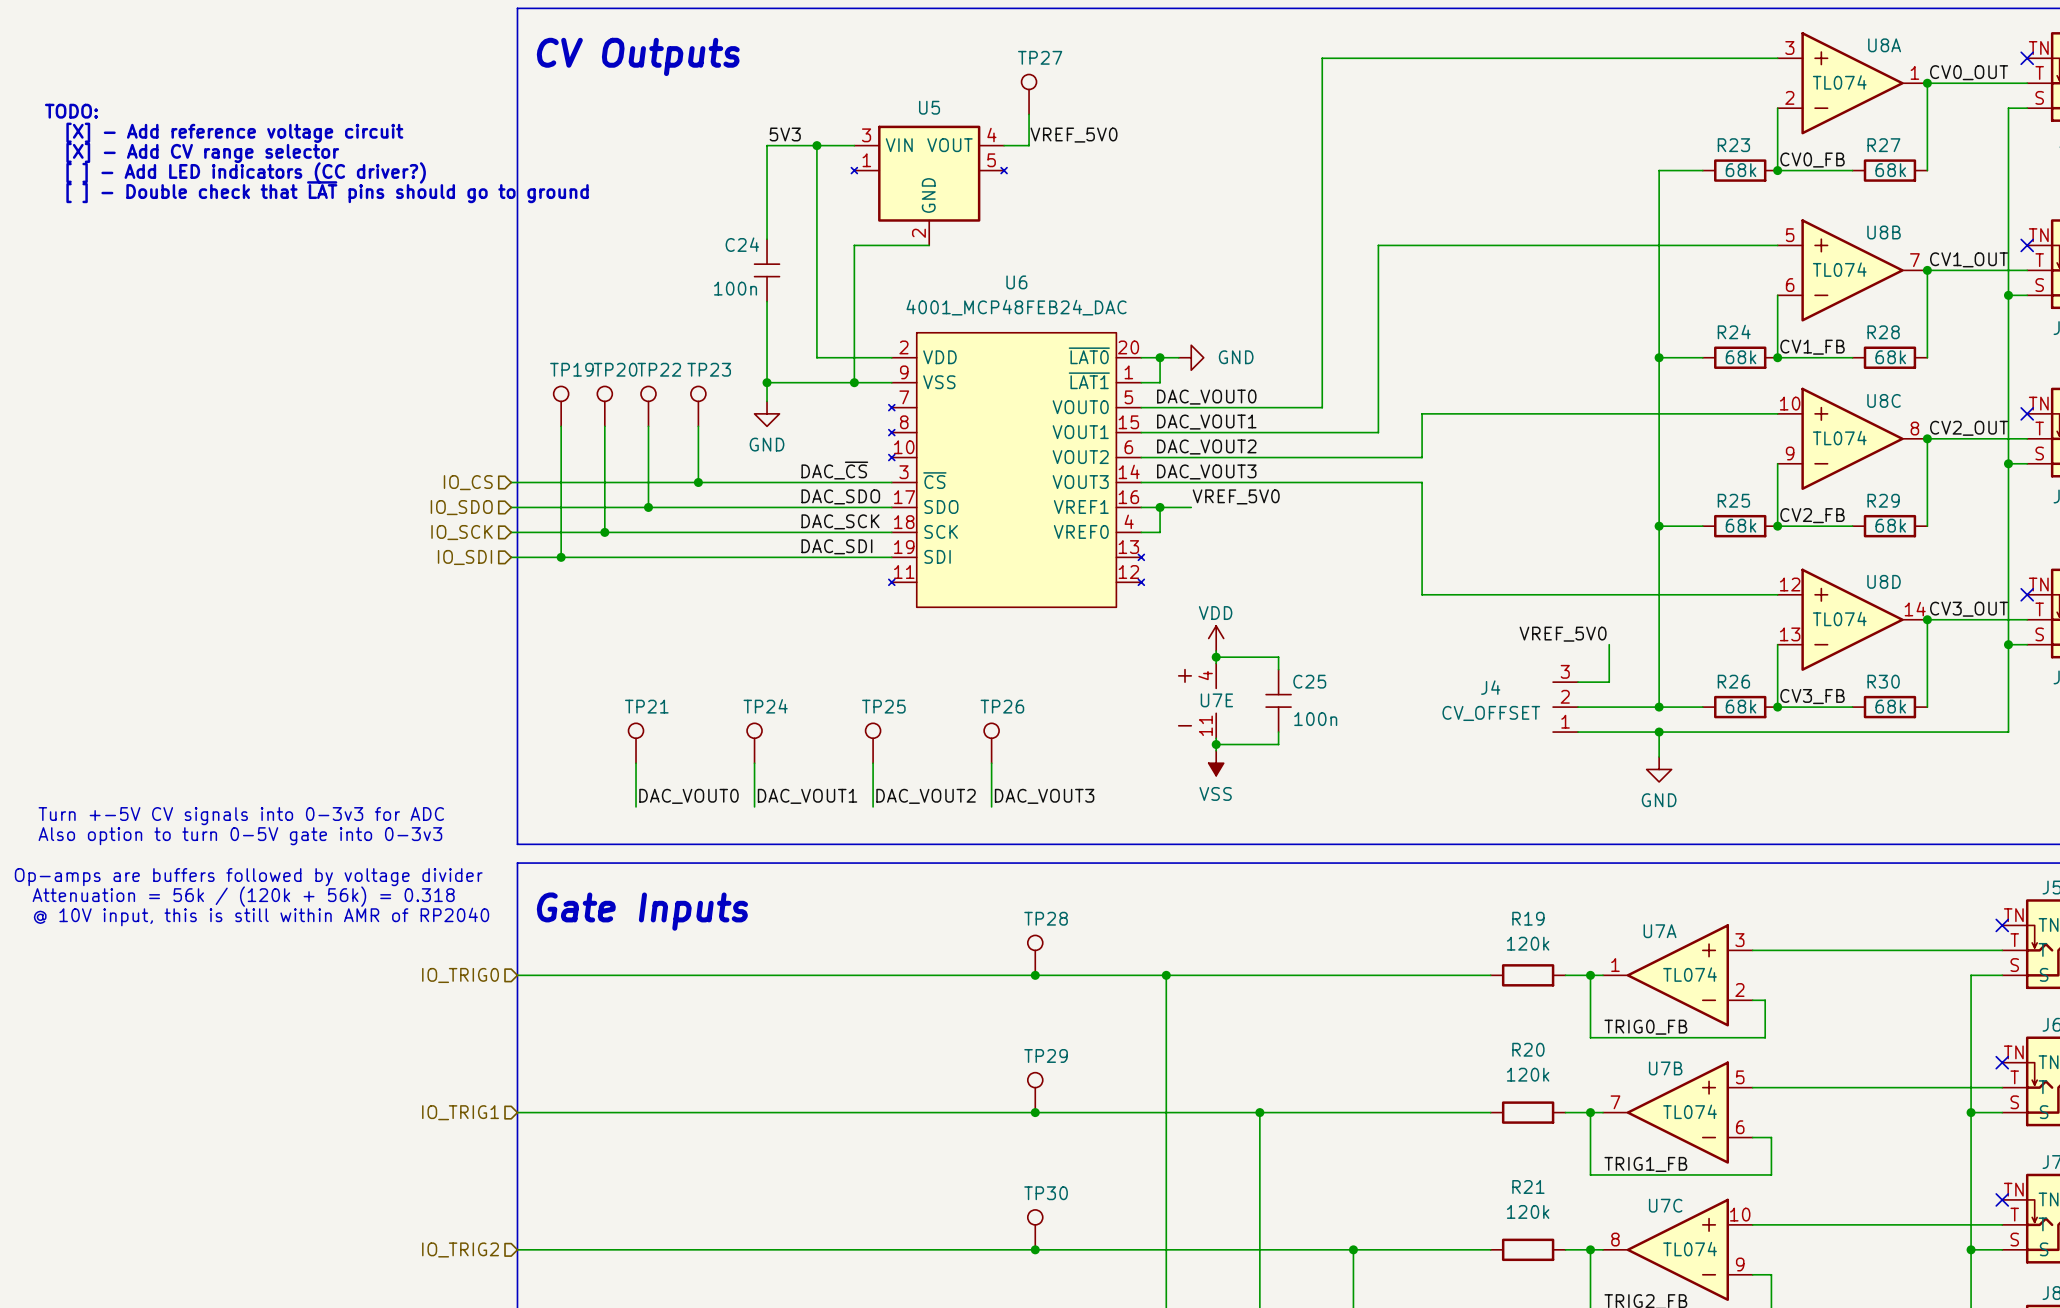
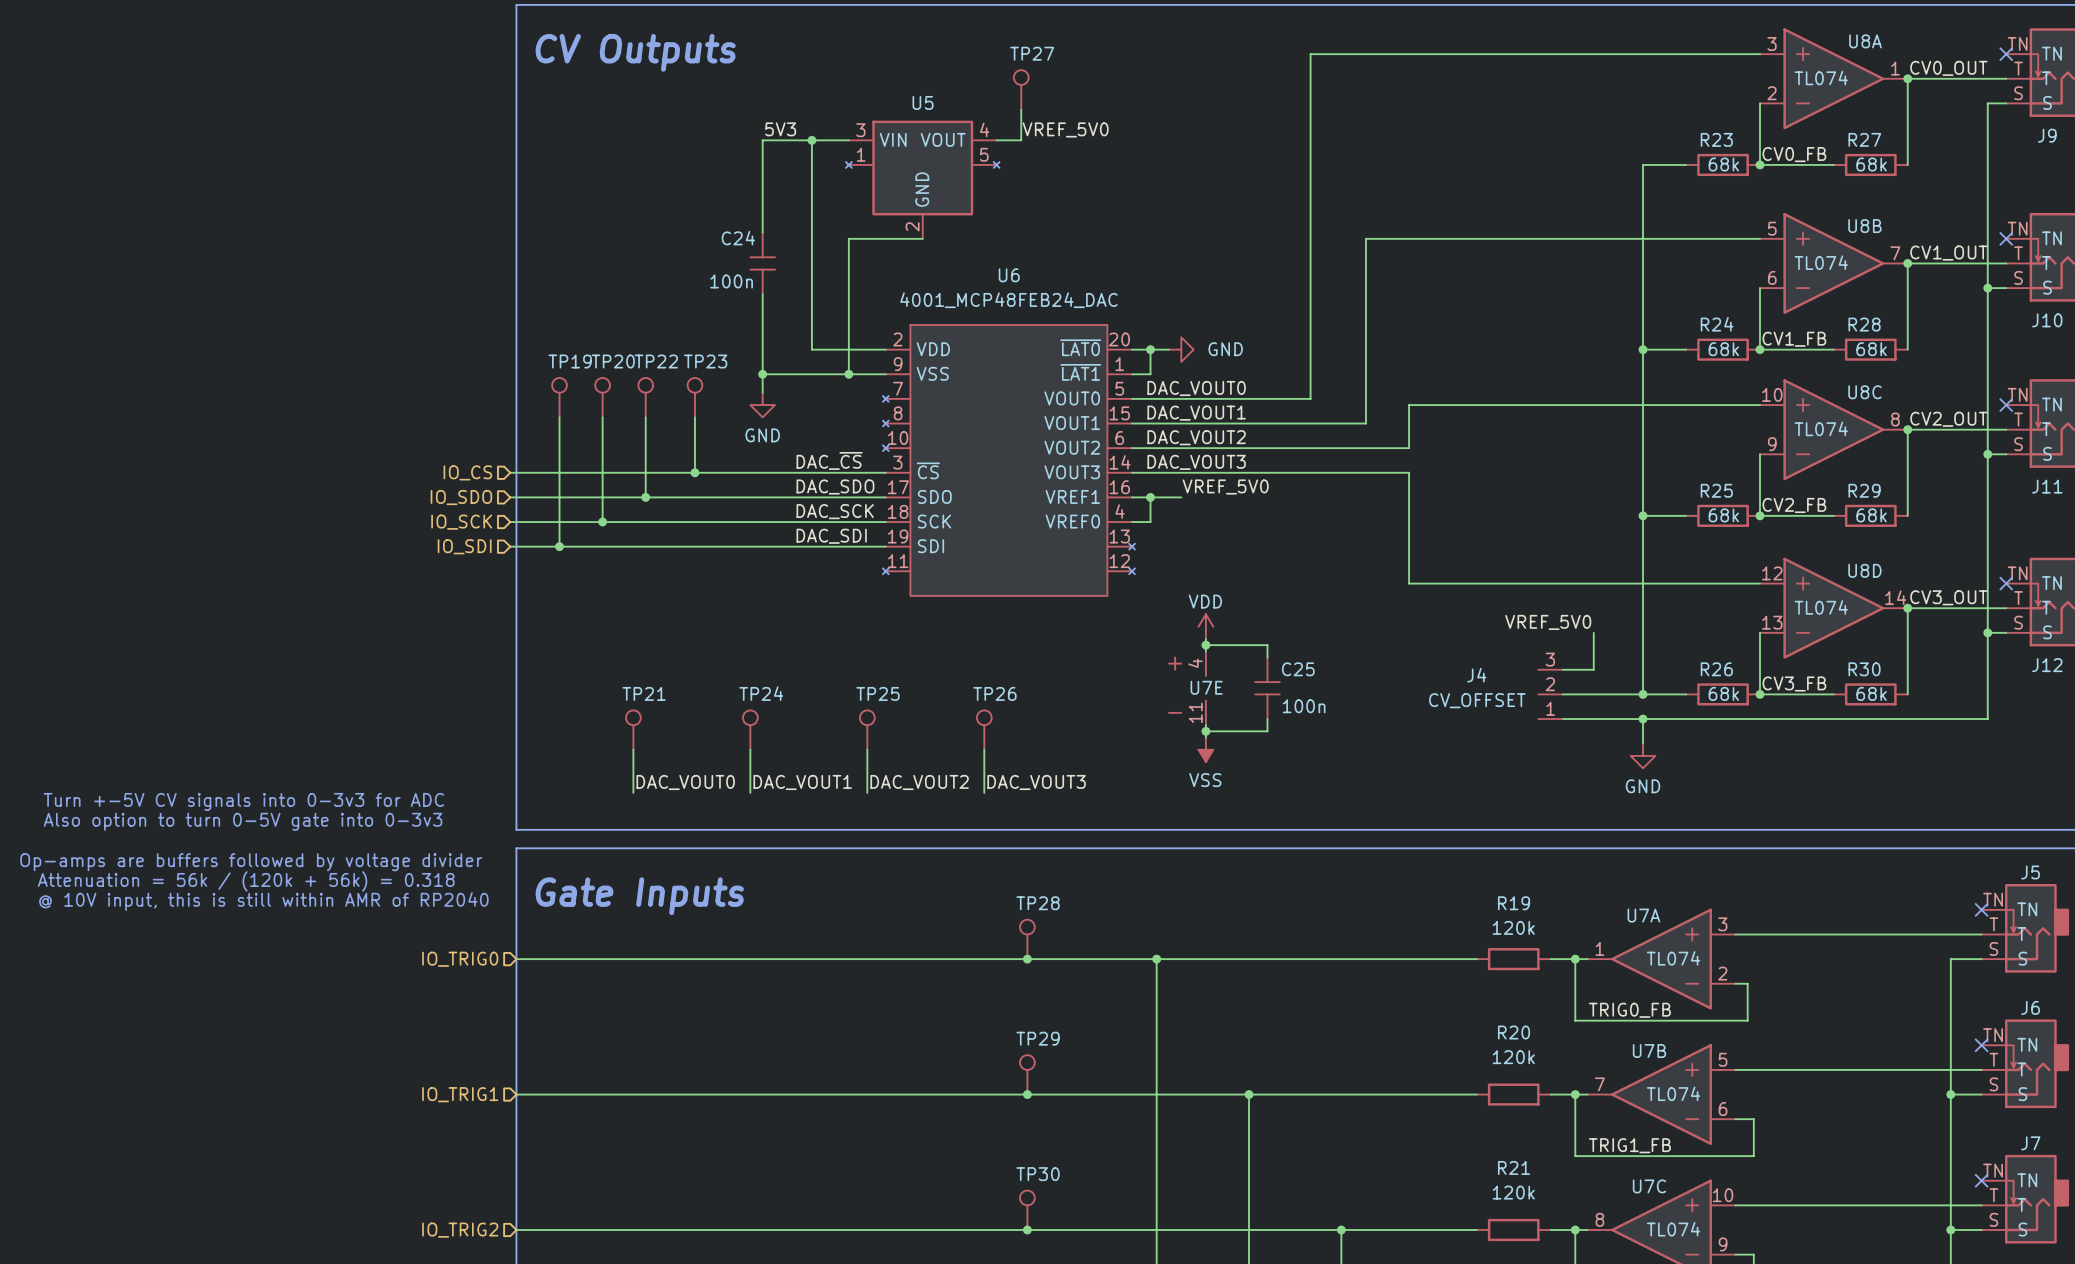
text: TODO: (71, 111) -> none
text: [X] - Add reference voltage circuit (234, 132) -> none
text: [X] - Add CV range selector (202, 152) -> none
text: [ ] - Add LED indicators (CC driver?) (246, 172) -> none
text: [ ] - Double check that ~{LAT} pins should go to ground (327, 192) -> none

